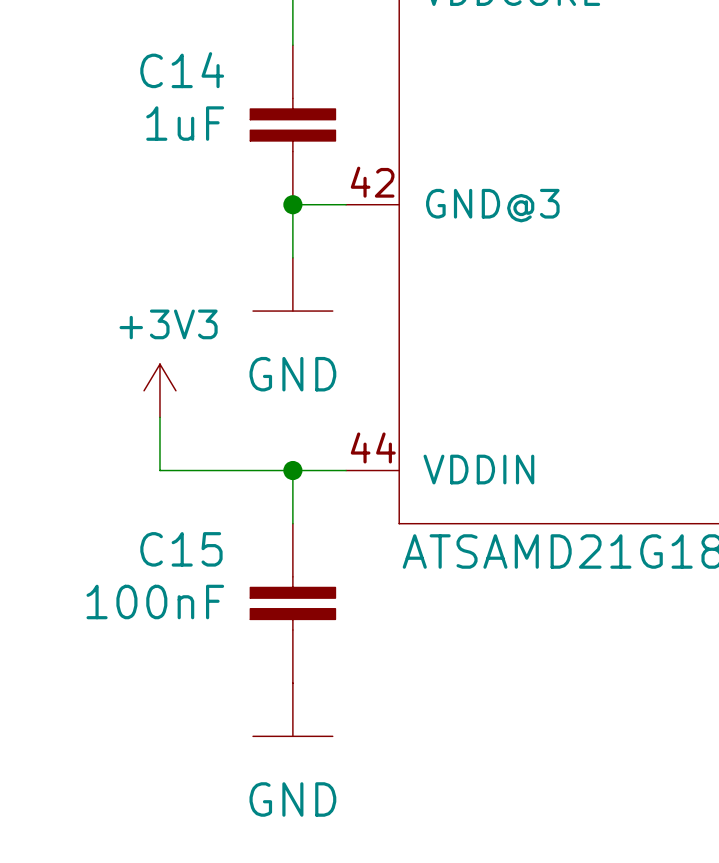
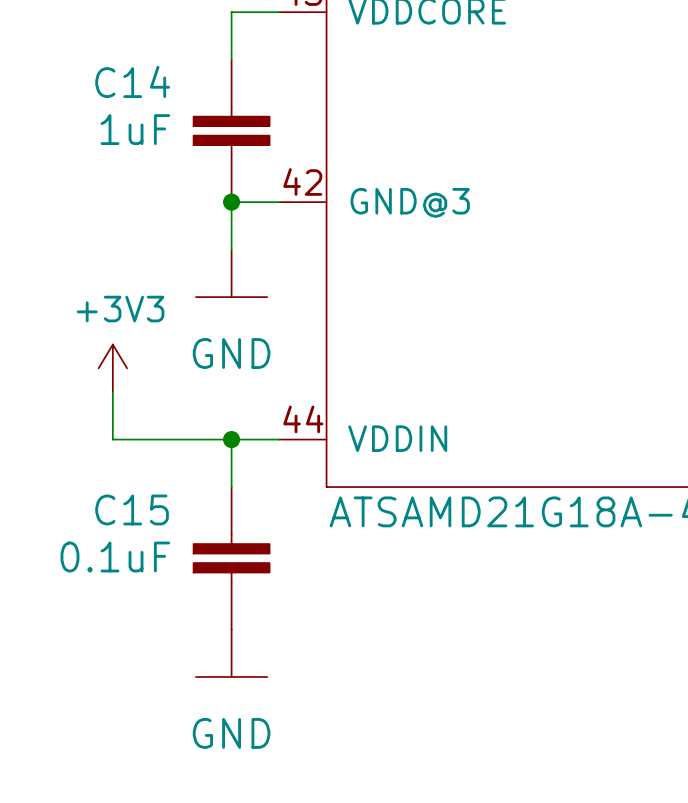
C15 value: 100nF (155, 602) -> 0.1uF (115, 557)

